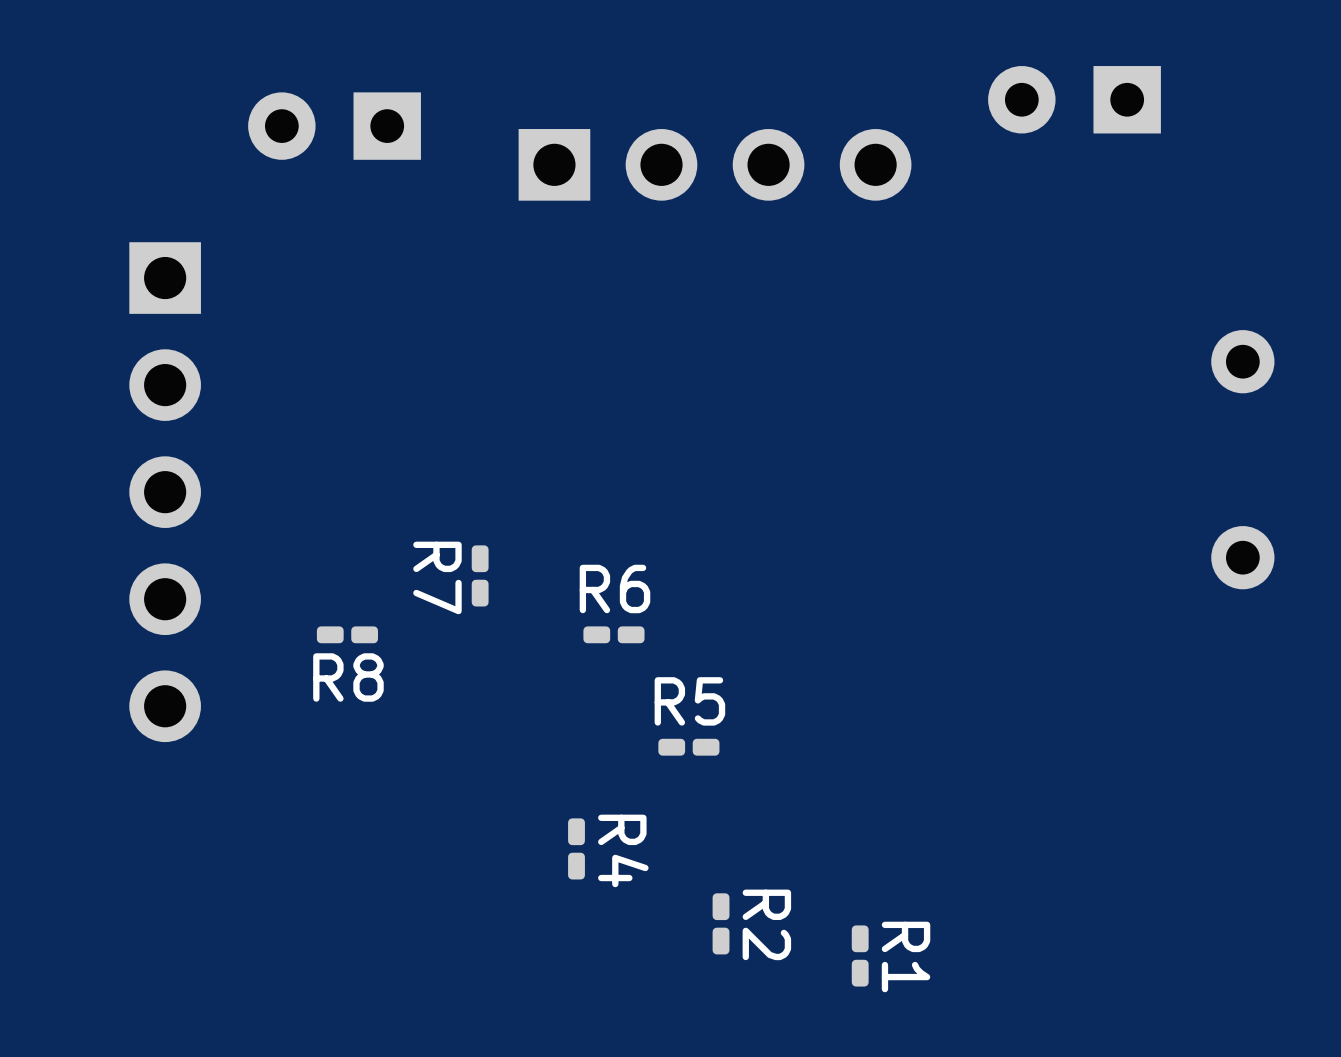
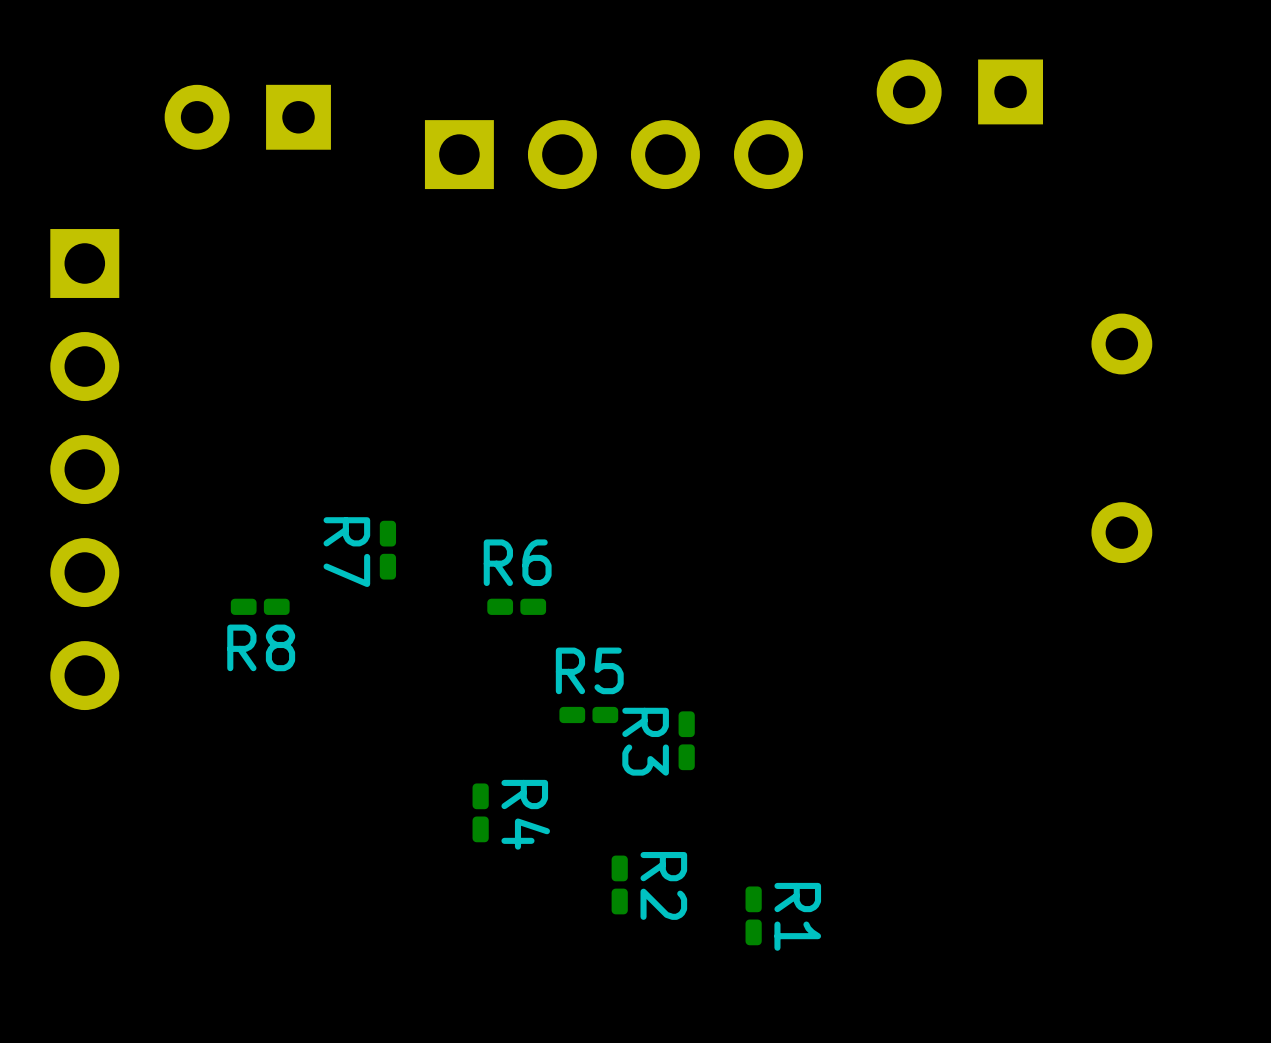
R3: none -> (686, 740)

